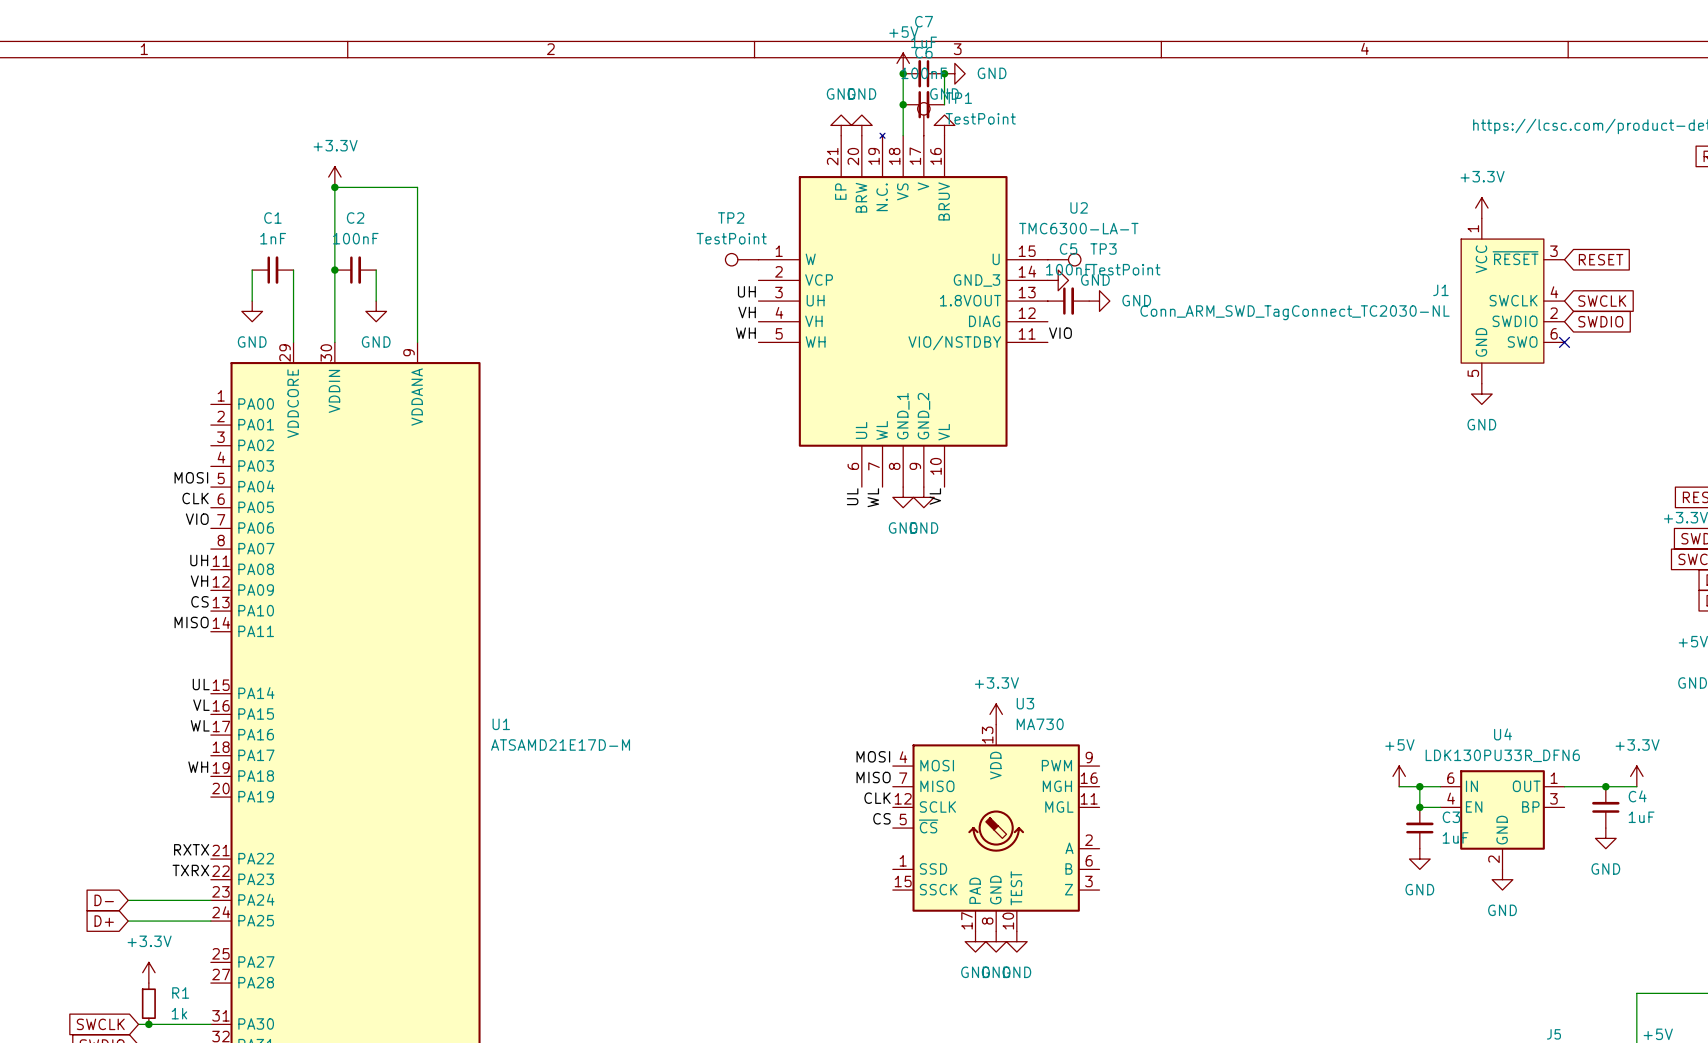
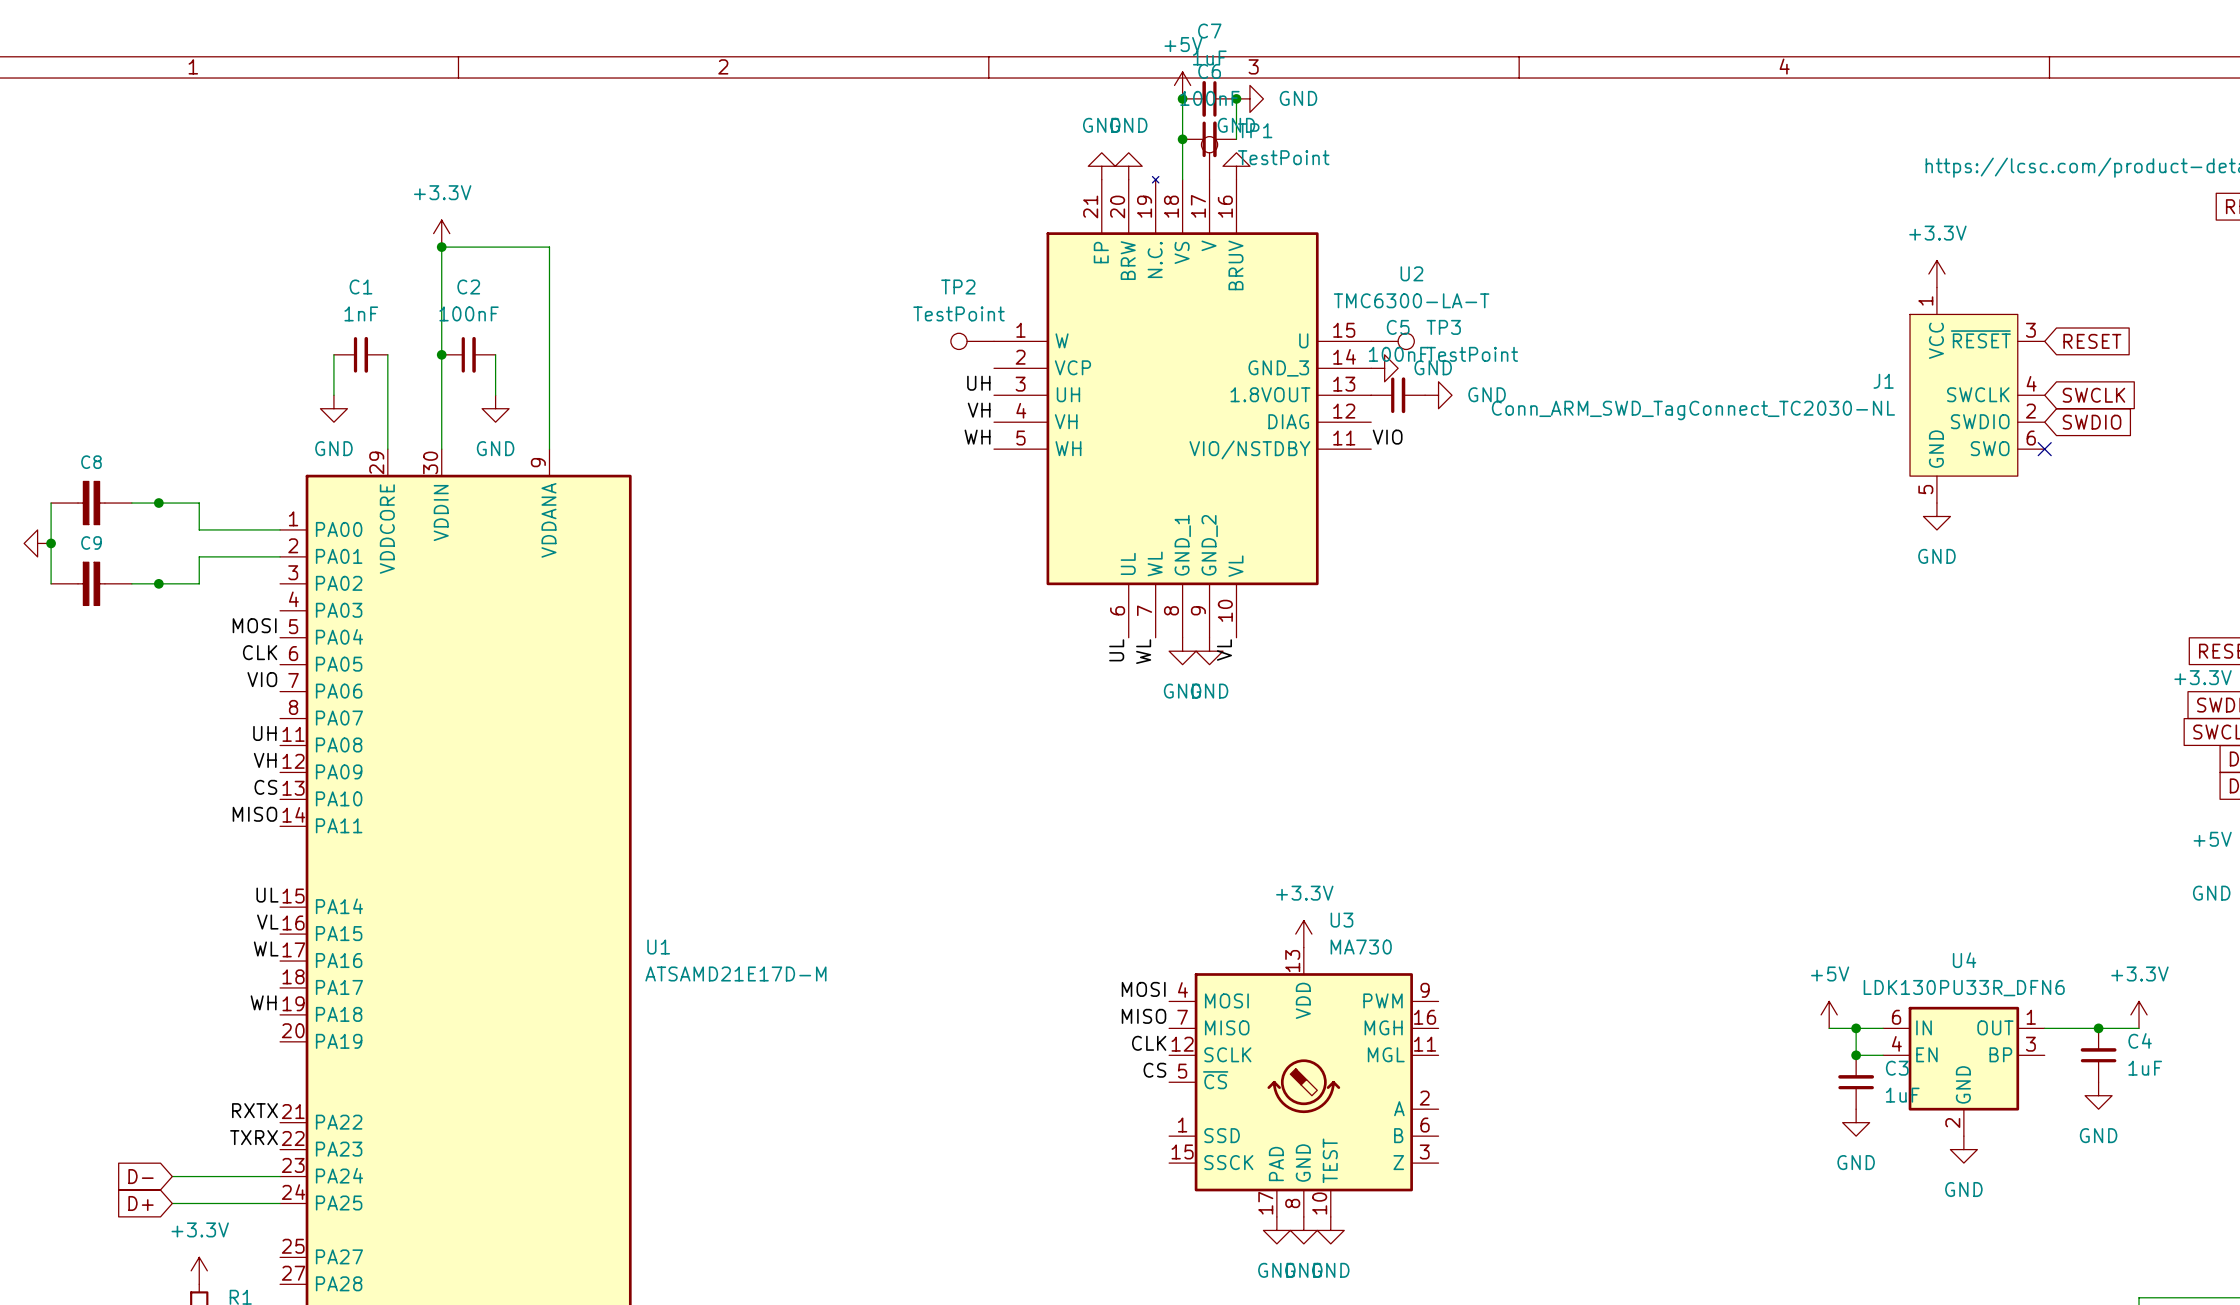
wire: none -> (51, 503) (51, 583)
C8: none -> (91, 503)
wire: none -> (131, 503) (199, 503) (199, 529) (280, 529)
junction: none -> (158, 503)
power symbol: none -> (37, 543)
junction: none -> (51, 543)
wire: none -> (280, 556) (199, 556) (199, 583) (131, 583)
C9: none -> (91, 583)
junction: none -> (158, 583)

